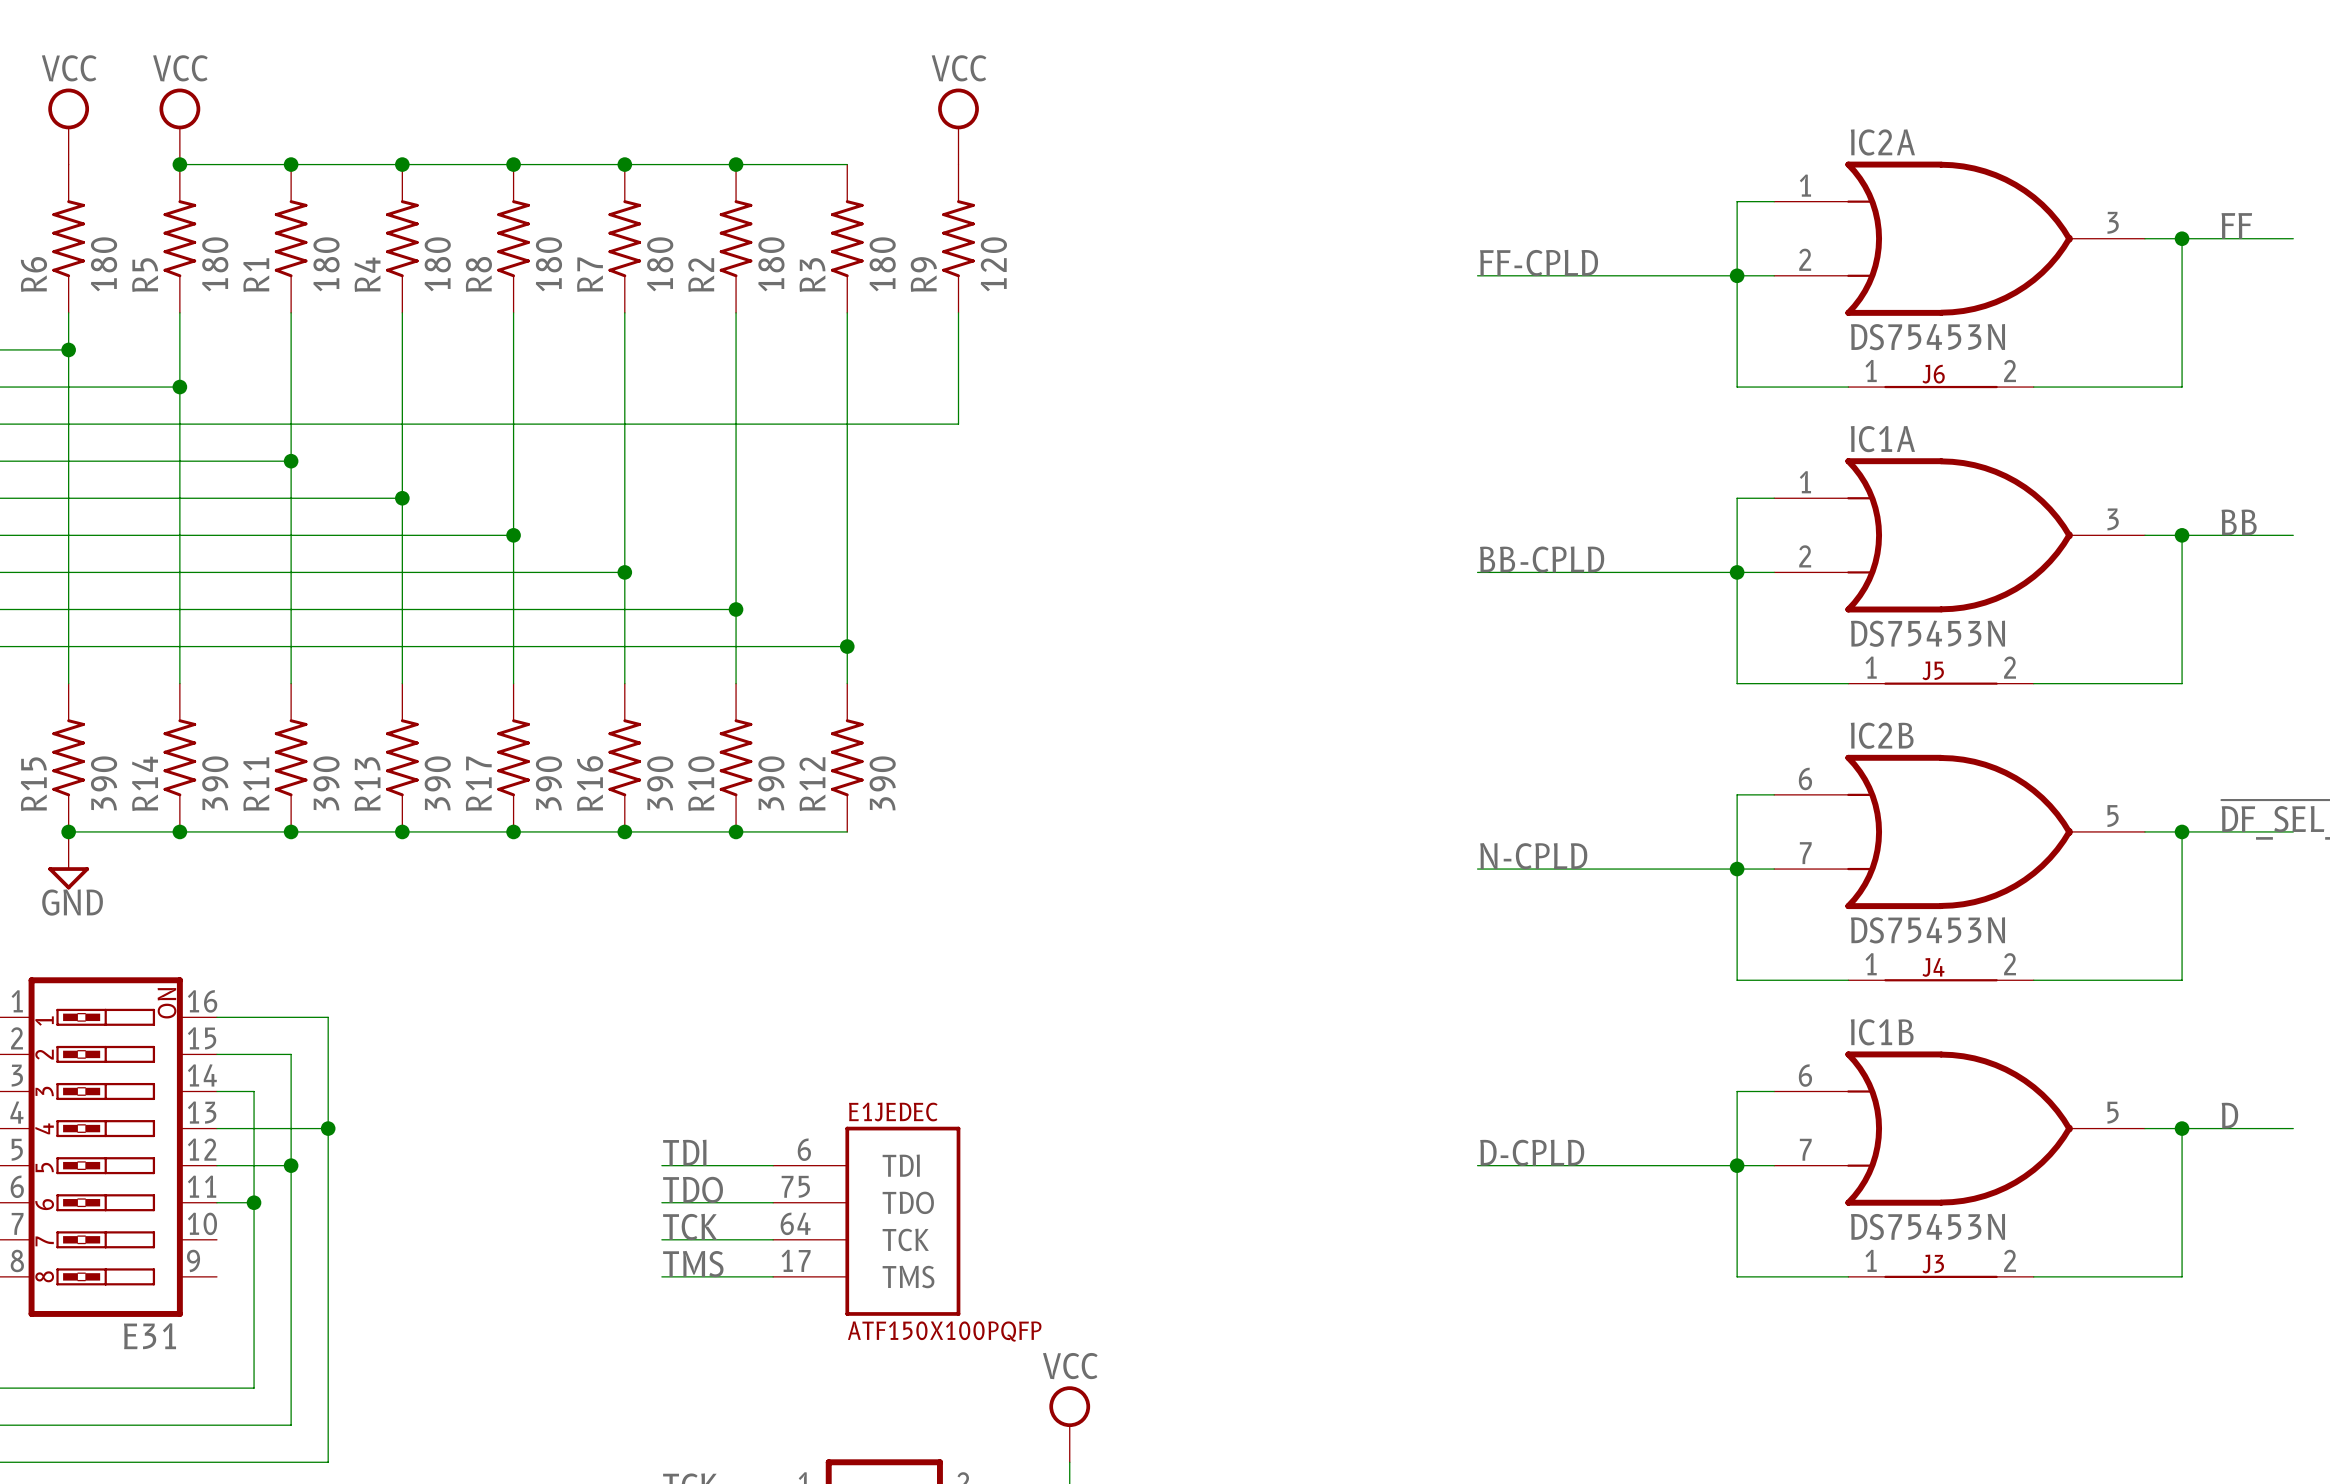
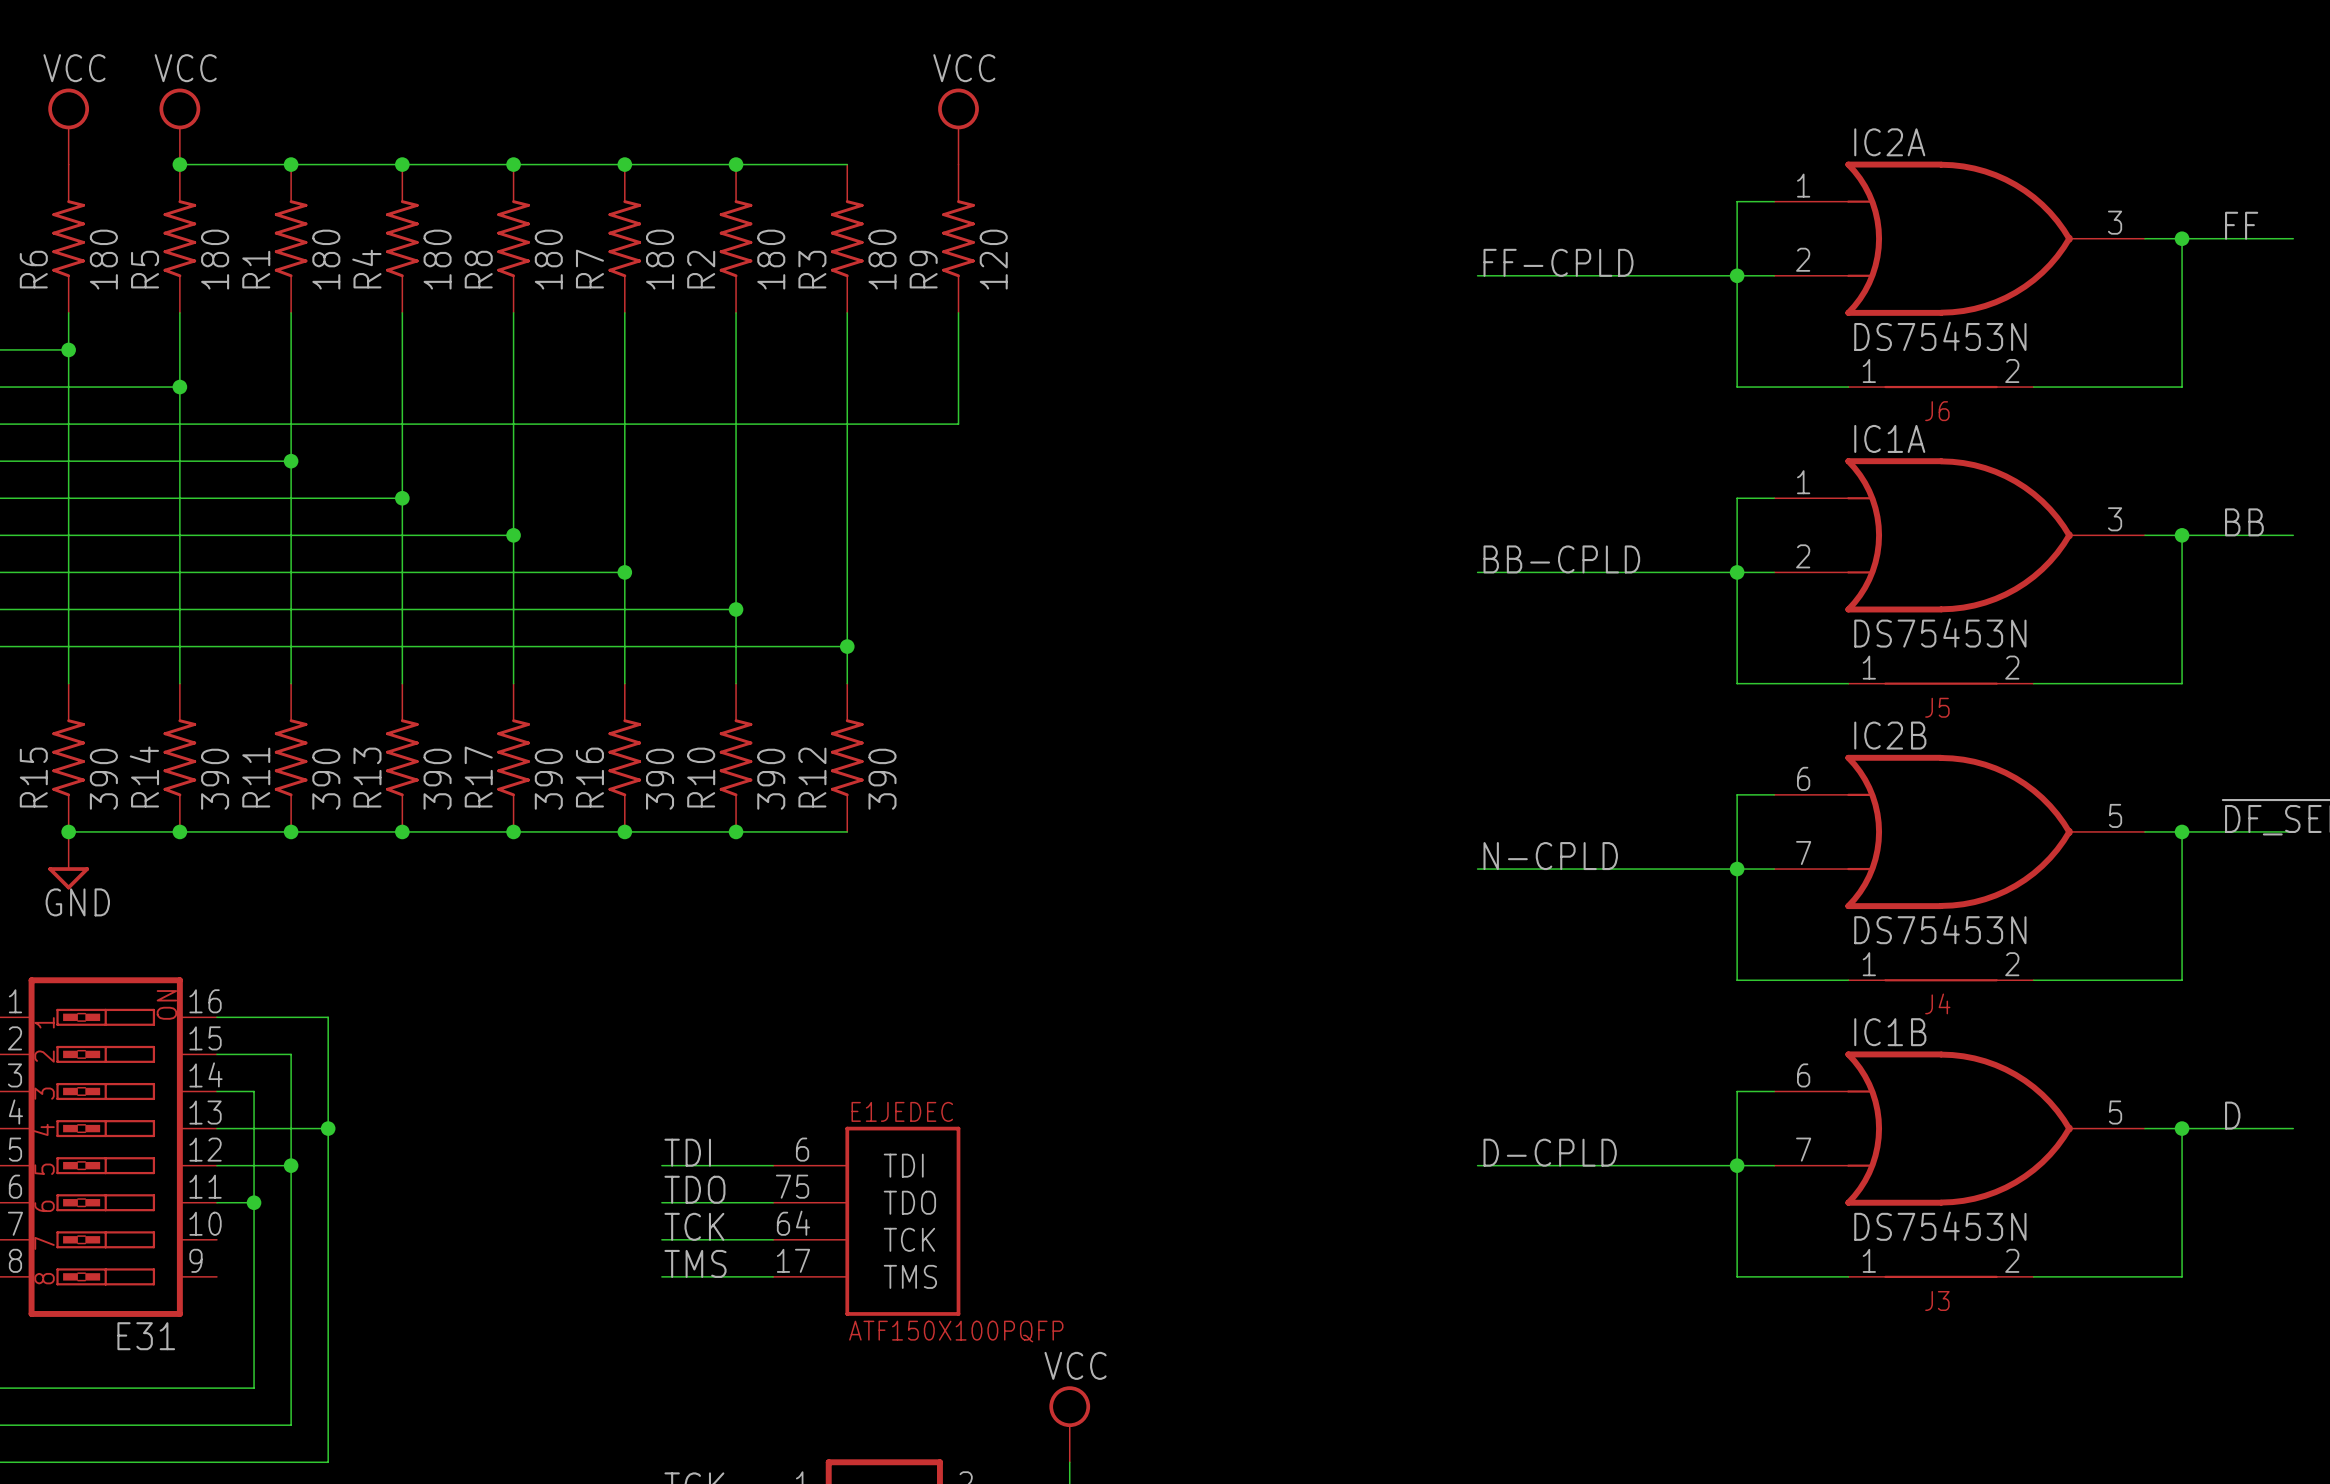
J6 name position: J6 (1933, 374) -> J6 (1937, 411)
J5 name position: J5 (1933, 670) -> J5 (1937, 707)
J4 name position: J4 (1933, 967) -> J4 (1937, 1003)
J3 name position: J3 (1933, 1264) -> J3 (1937, 1300)

